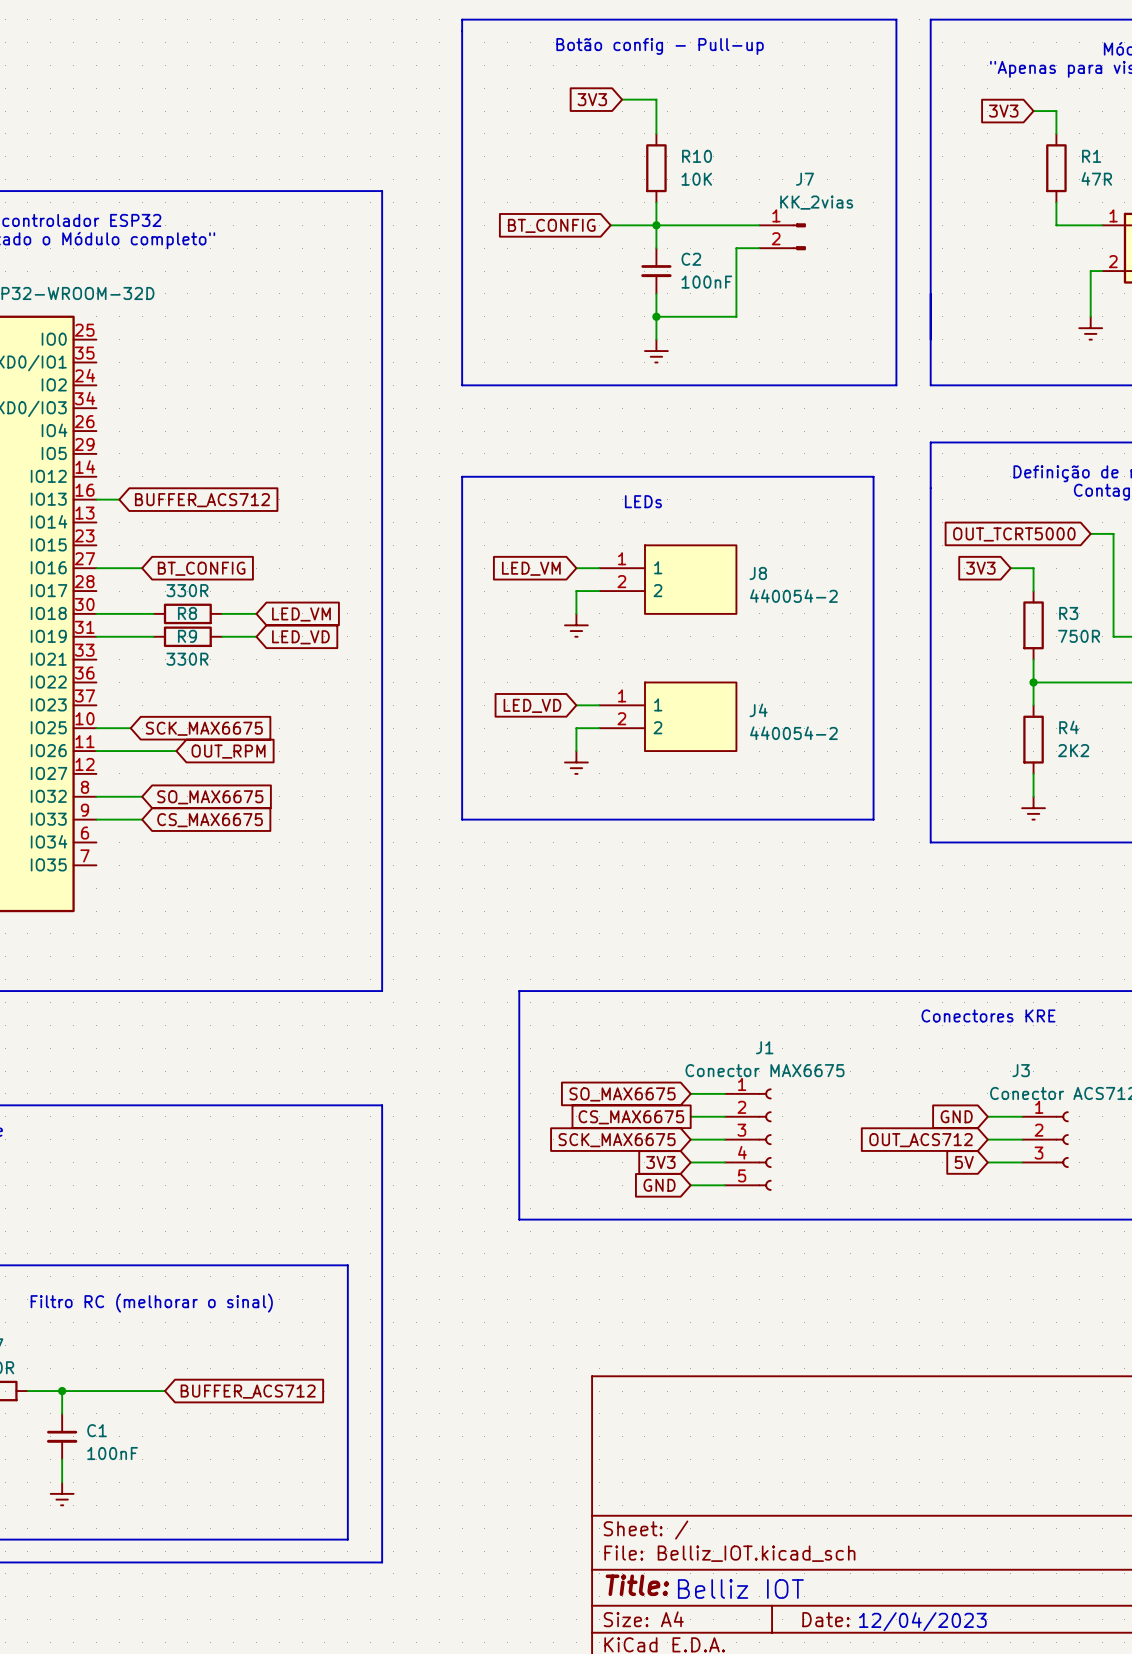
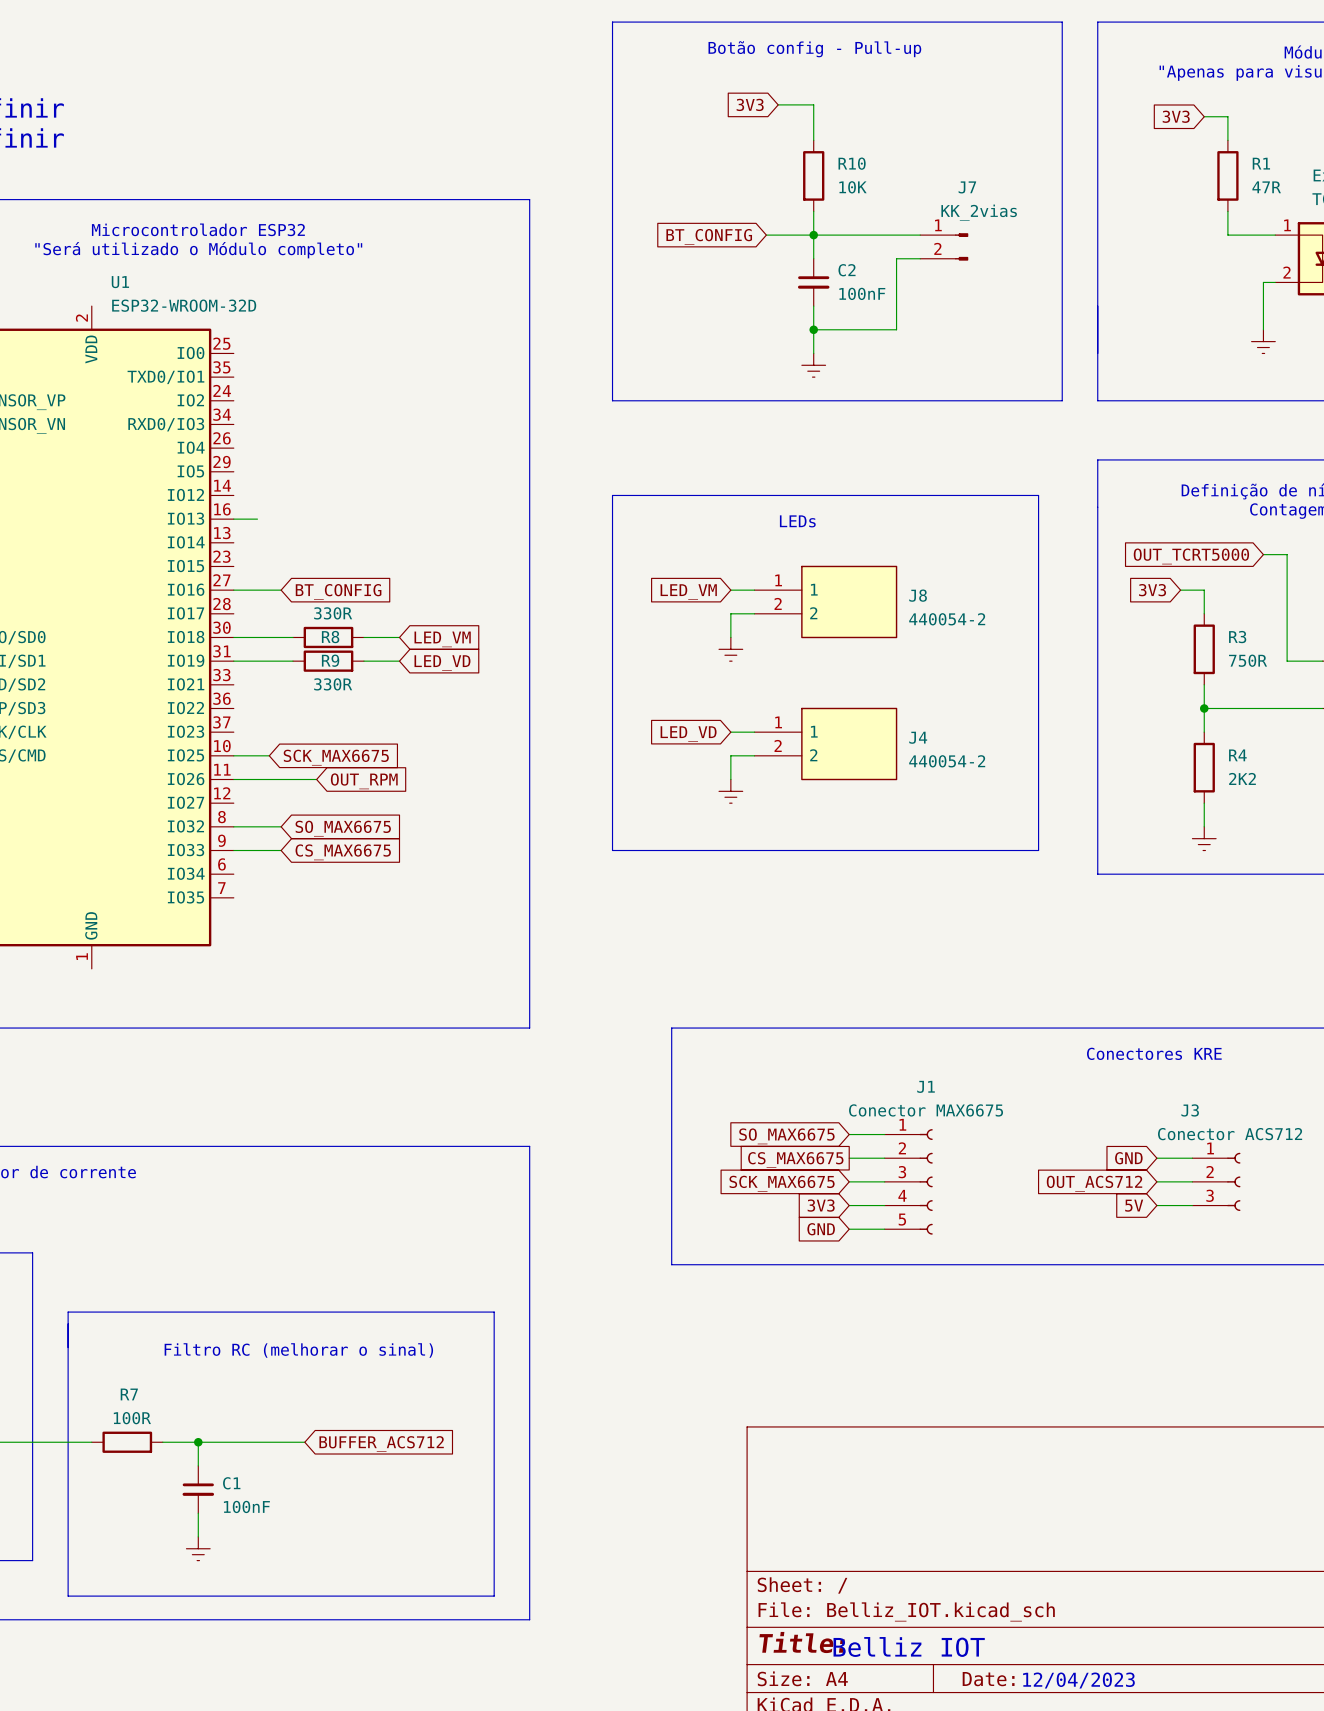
global label: BUFFER_ACS712 (202, 500) -> none

